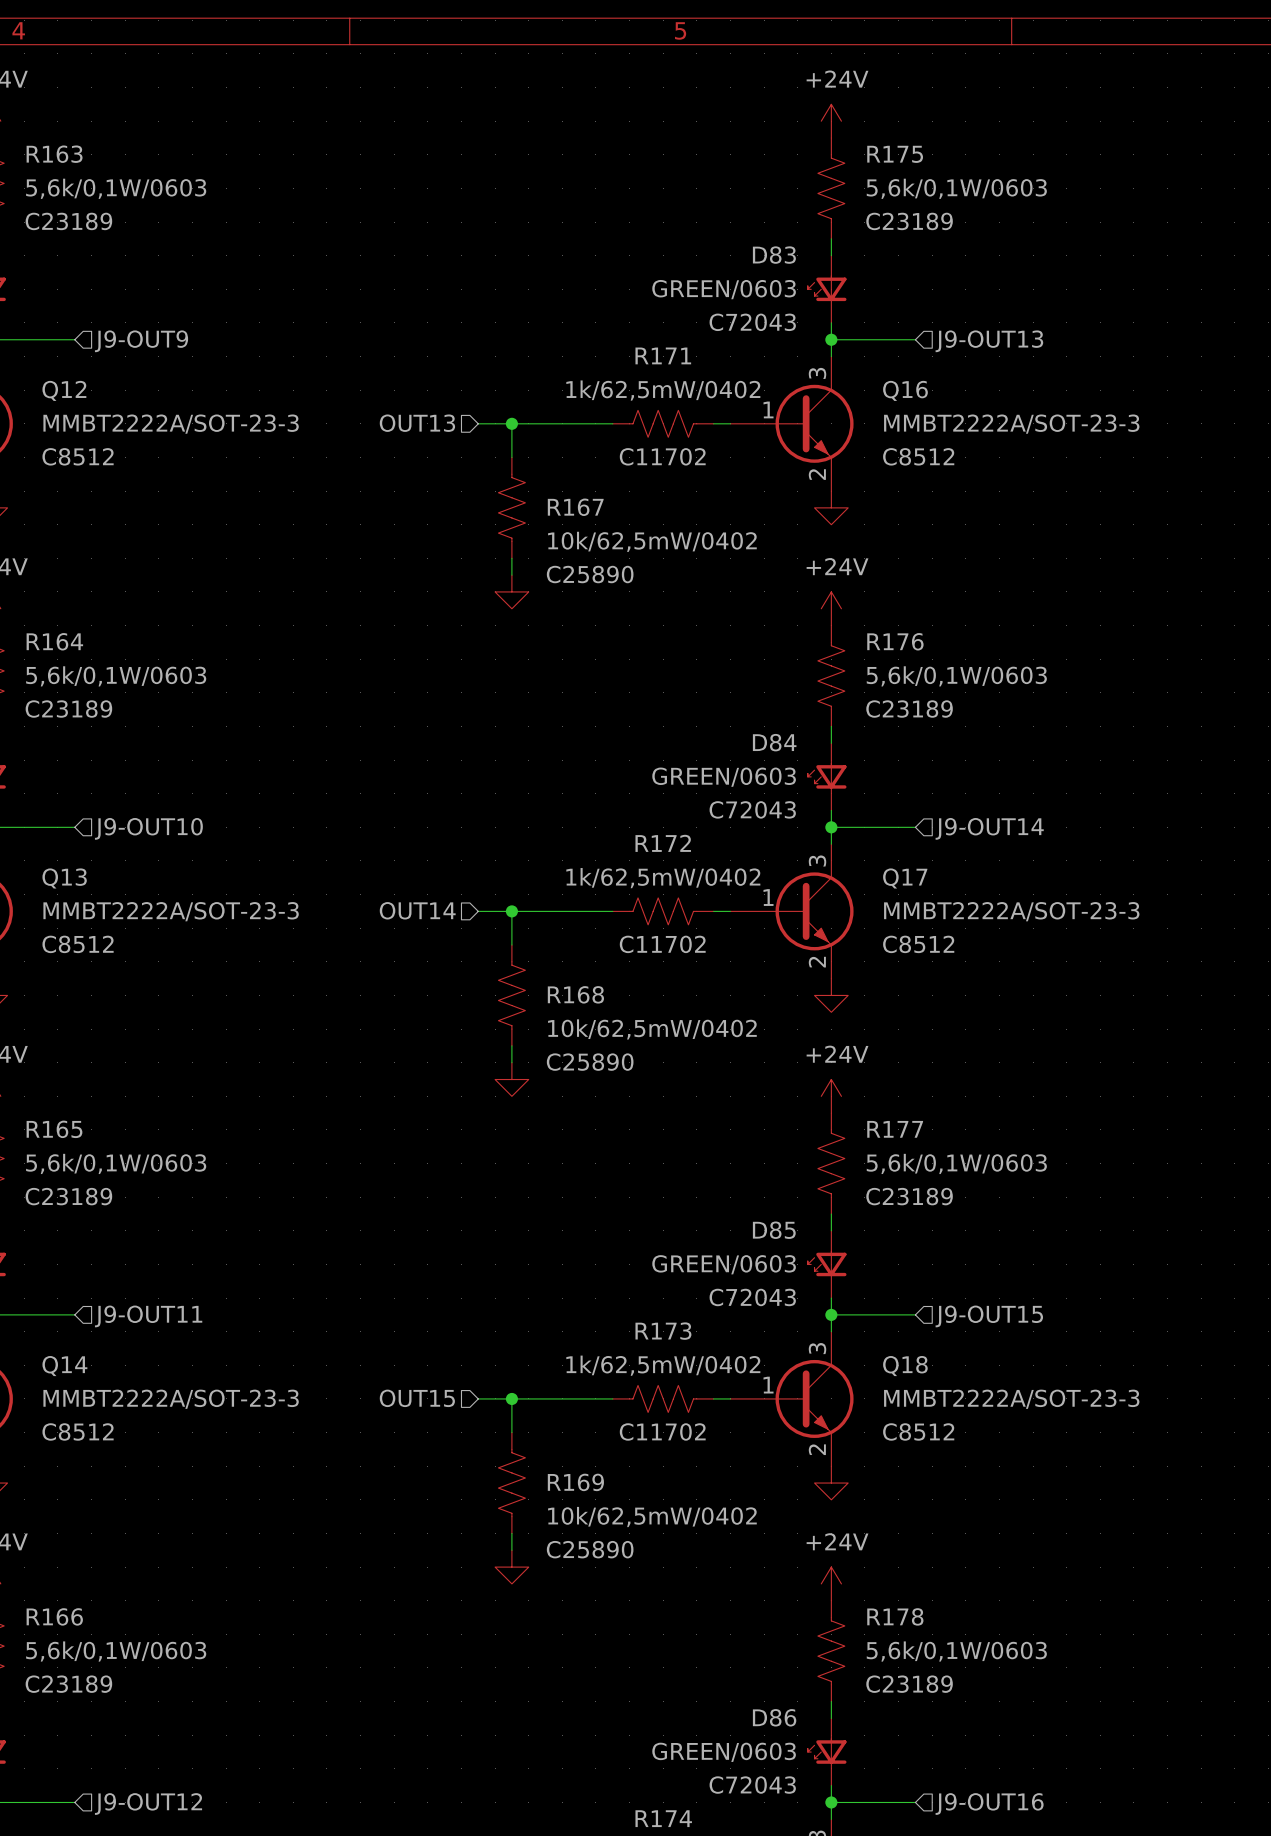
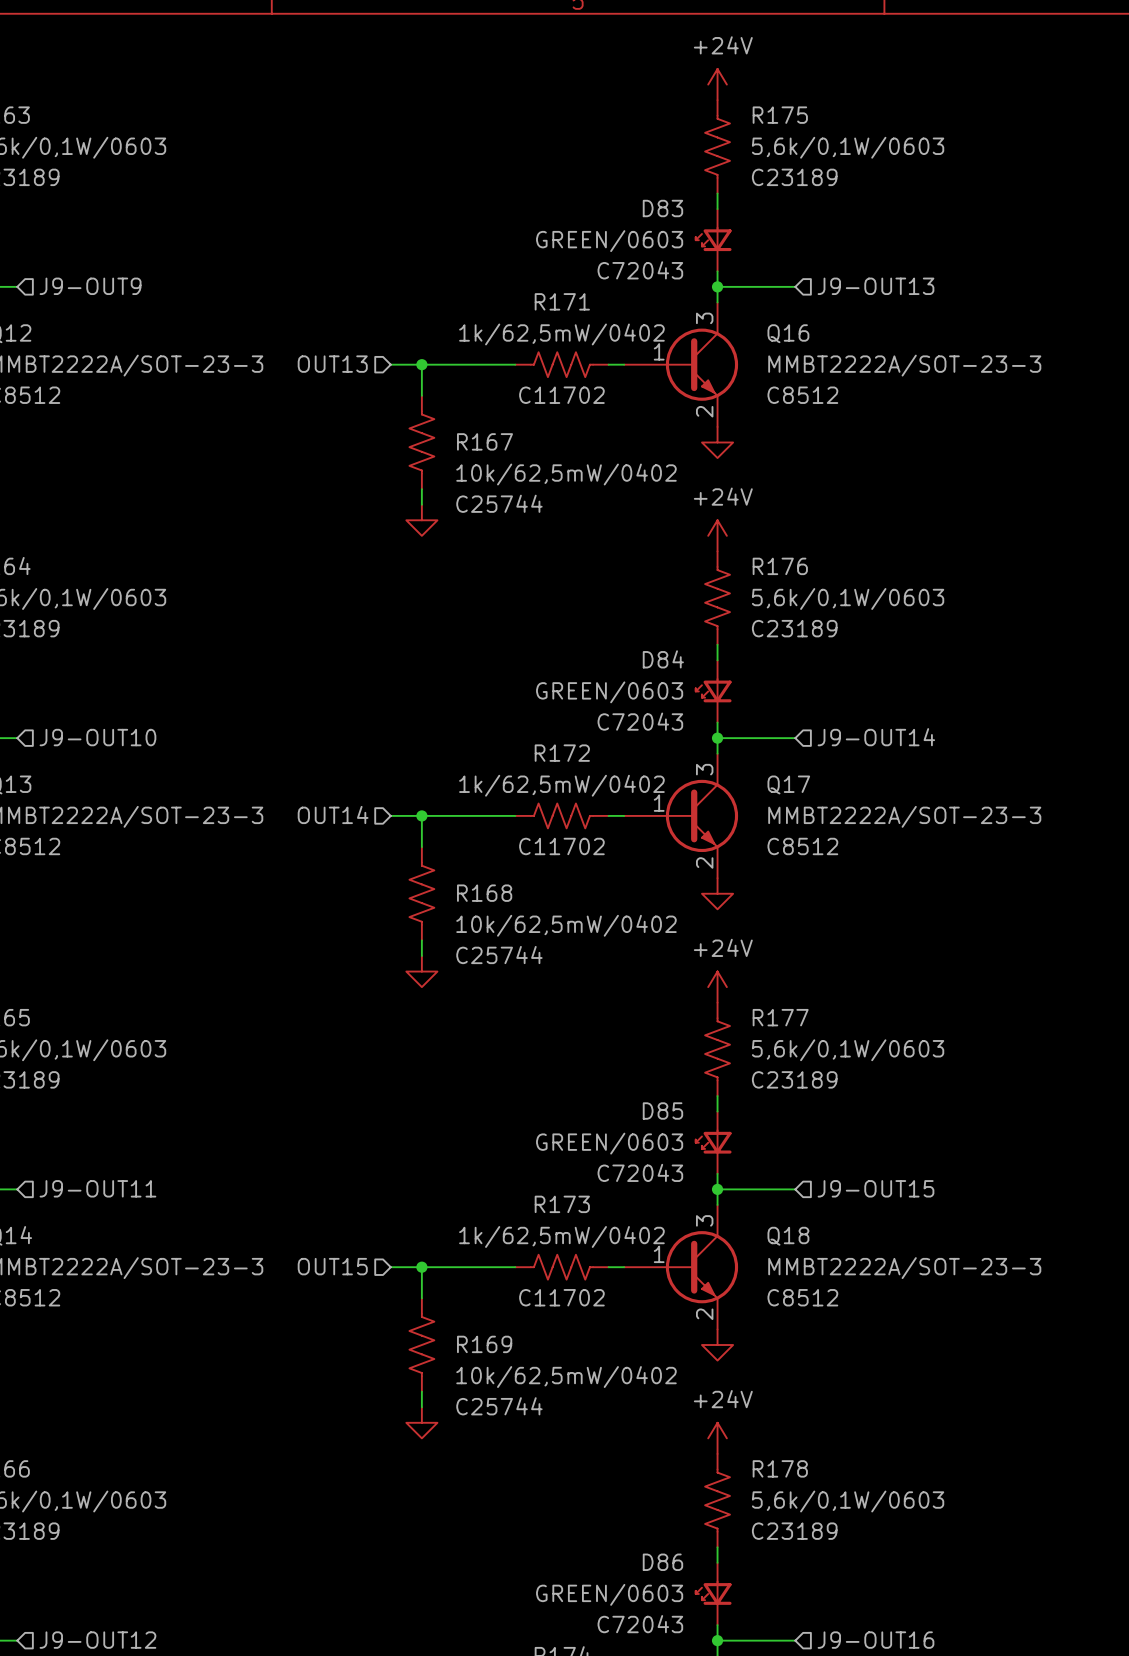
R167 text: C25890 (590, 574) -> C25744 (499, 503)
R168 text: C25890 (590, 1062) -> C25744 (499, 955)
R169 text: C25890 (590, 1549) -> C25744 (499, 1406)

